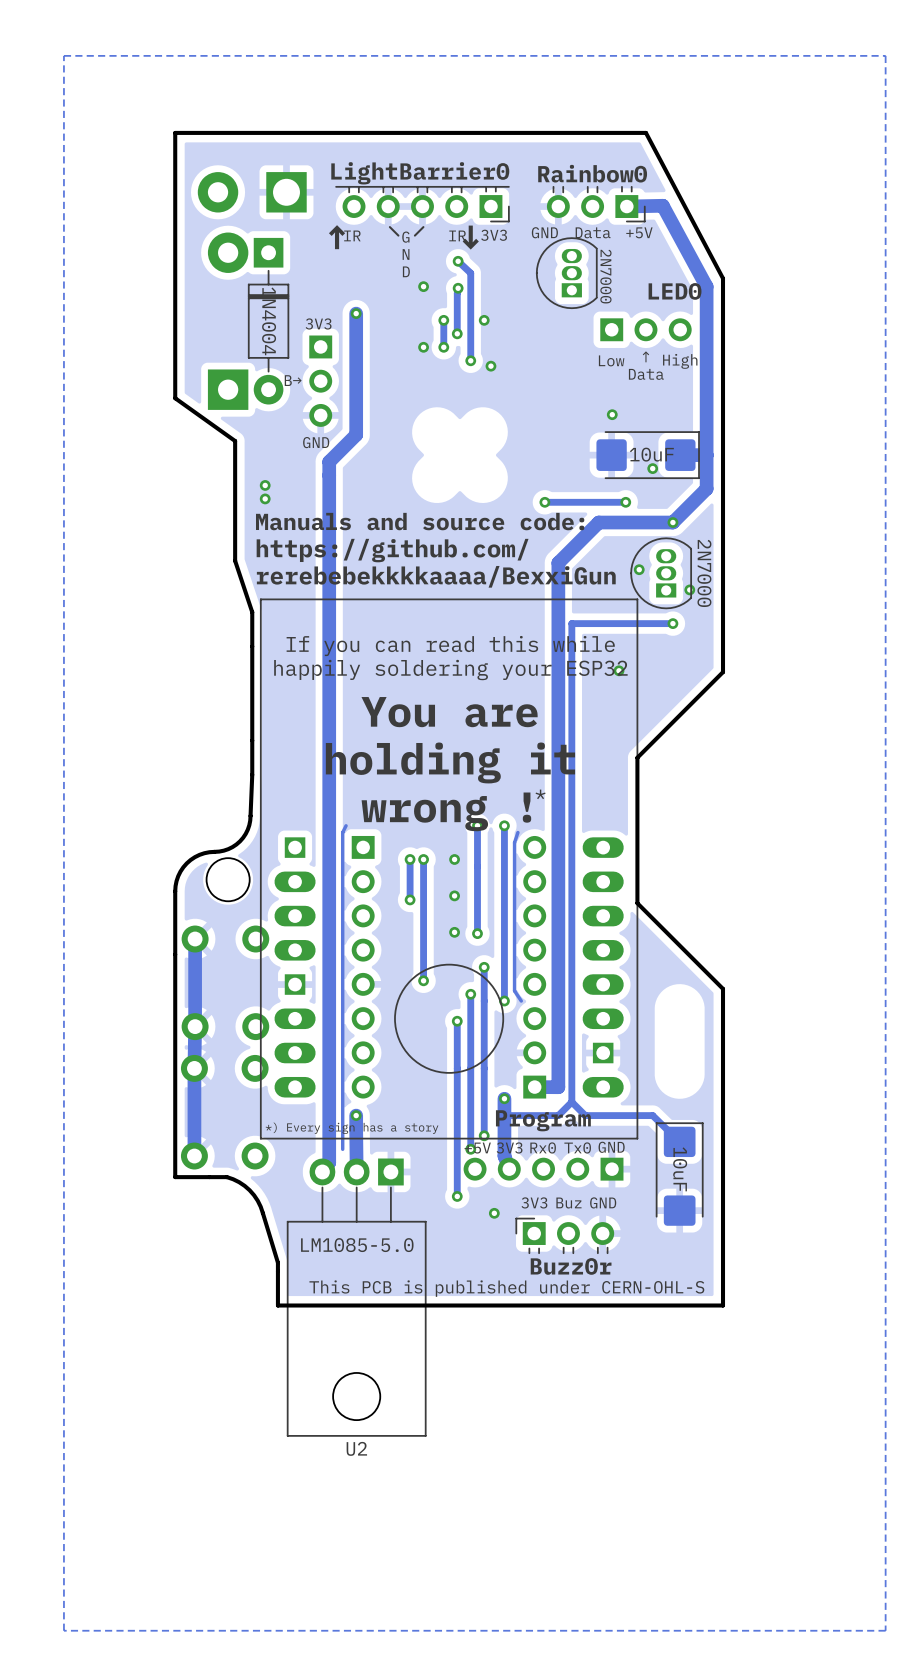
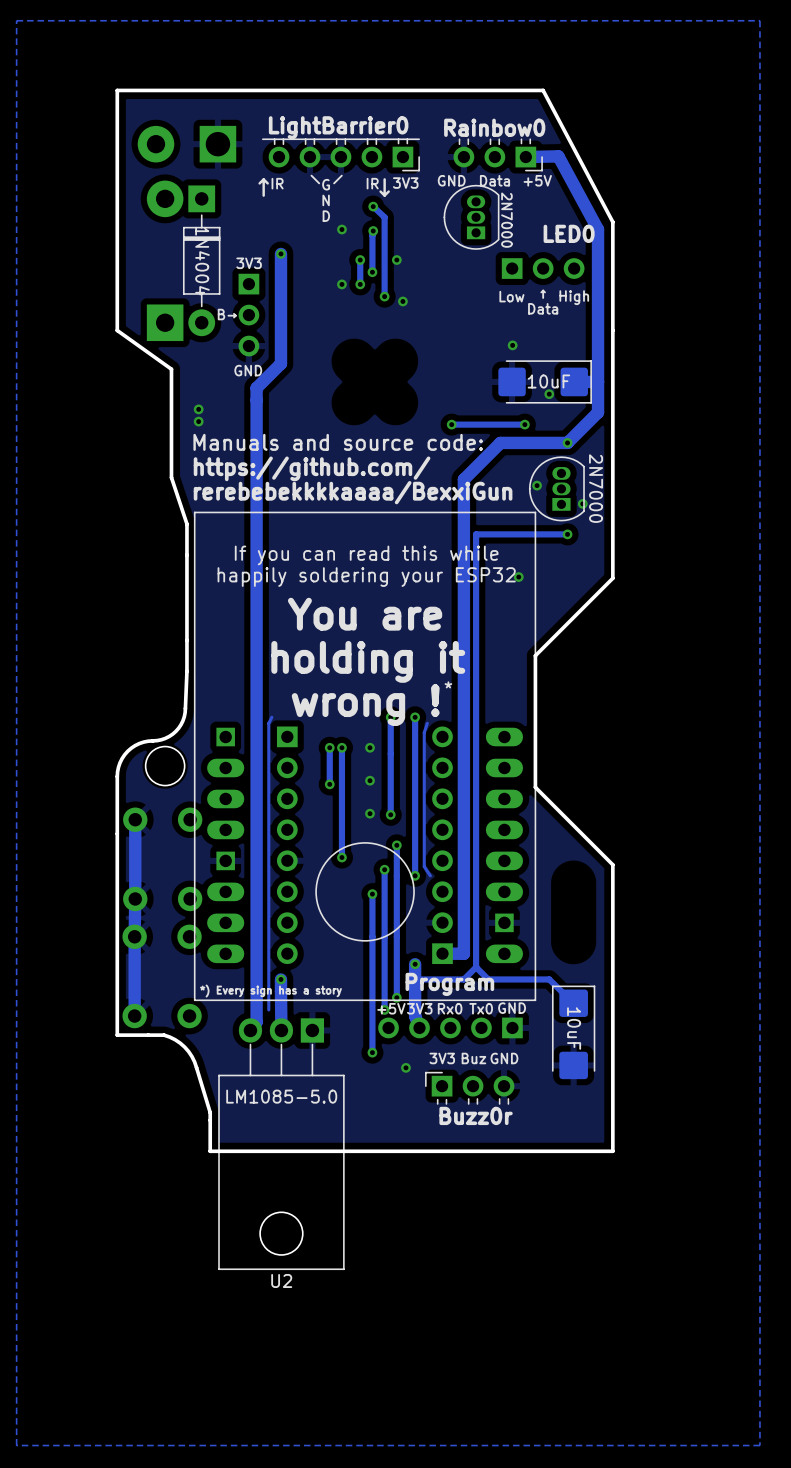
text: This PCB is published under CERN-OHL-S (506, 1288) -> none

